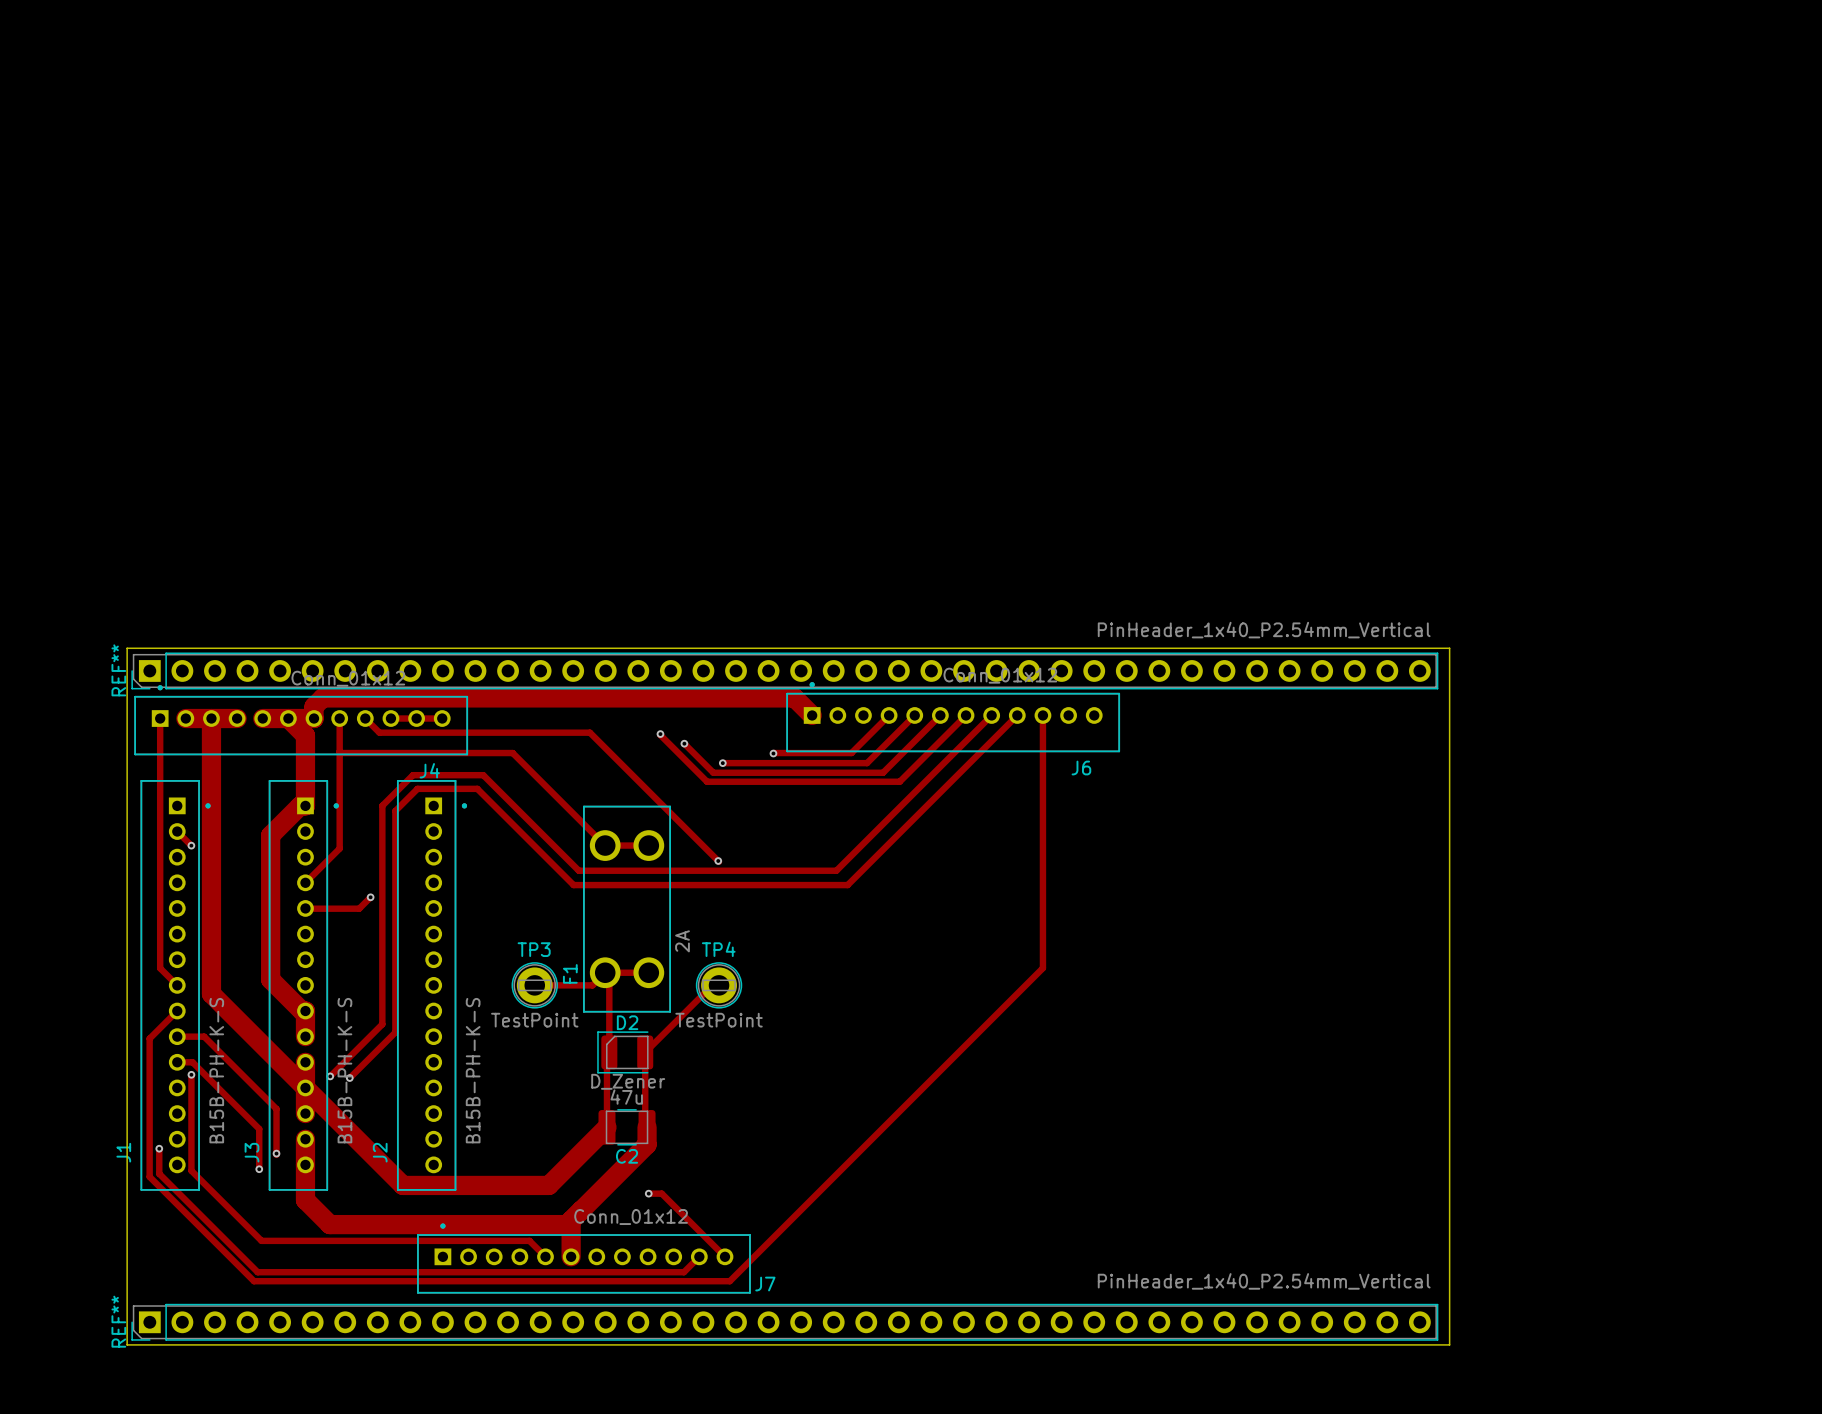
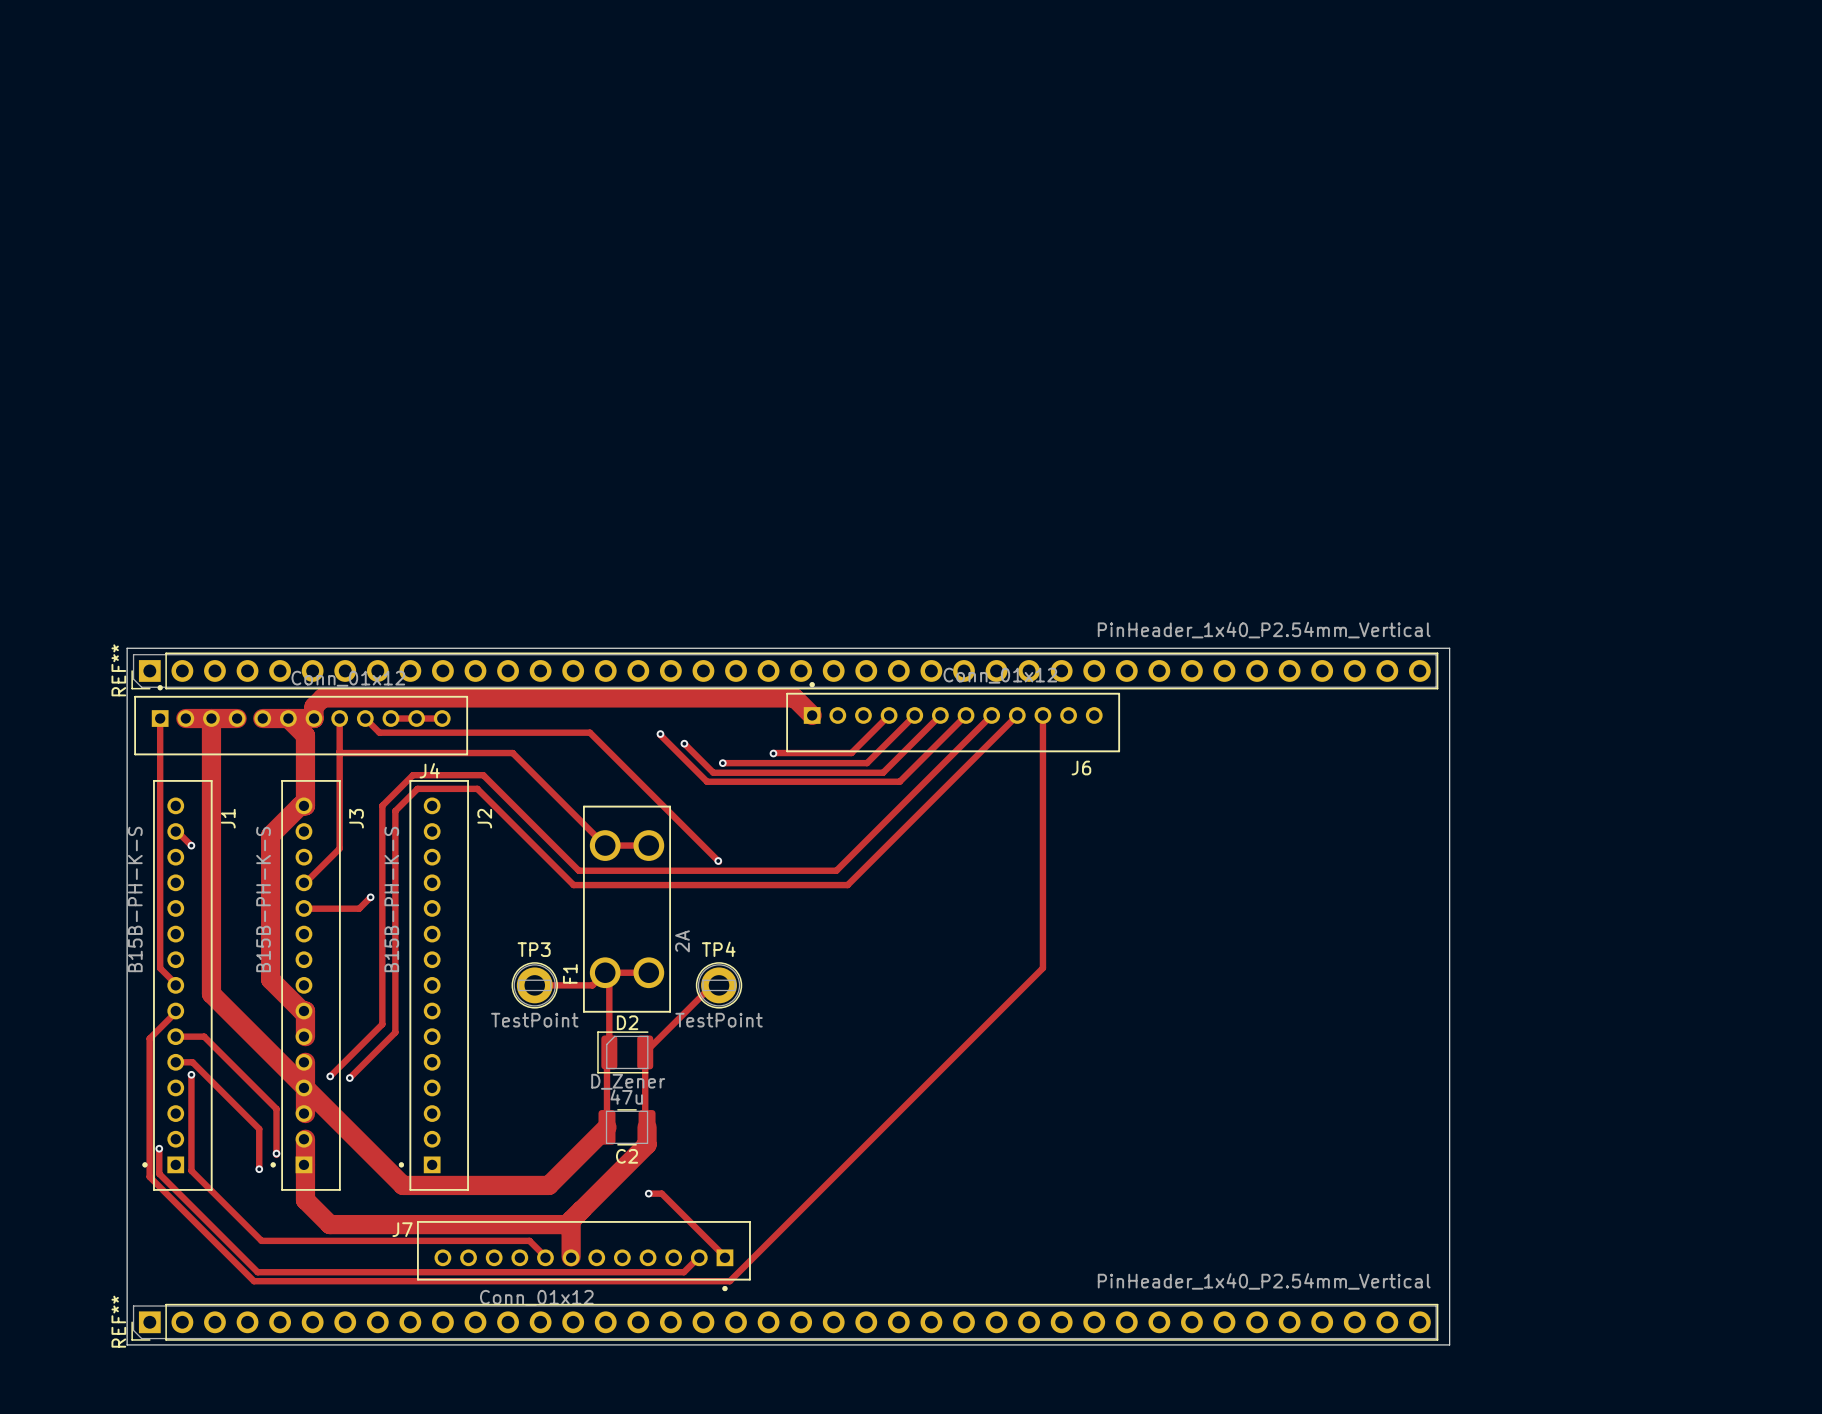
J1 rotation: 0° (175, 985) -> 180° (177, 985)
J3 rotation: 0° (303, 985) -> 180° (305, 985)
J2 rotation: 0° (432, 985) -> 180° (433, 985)
J7 rotation: 0° (583, 1258) -> 180° (583, 1256)

